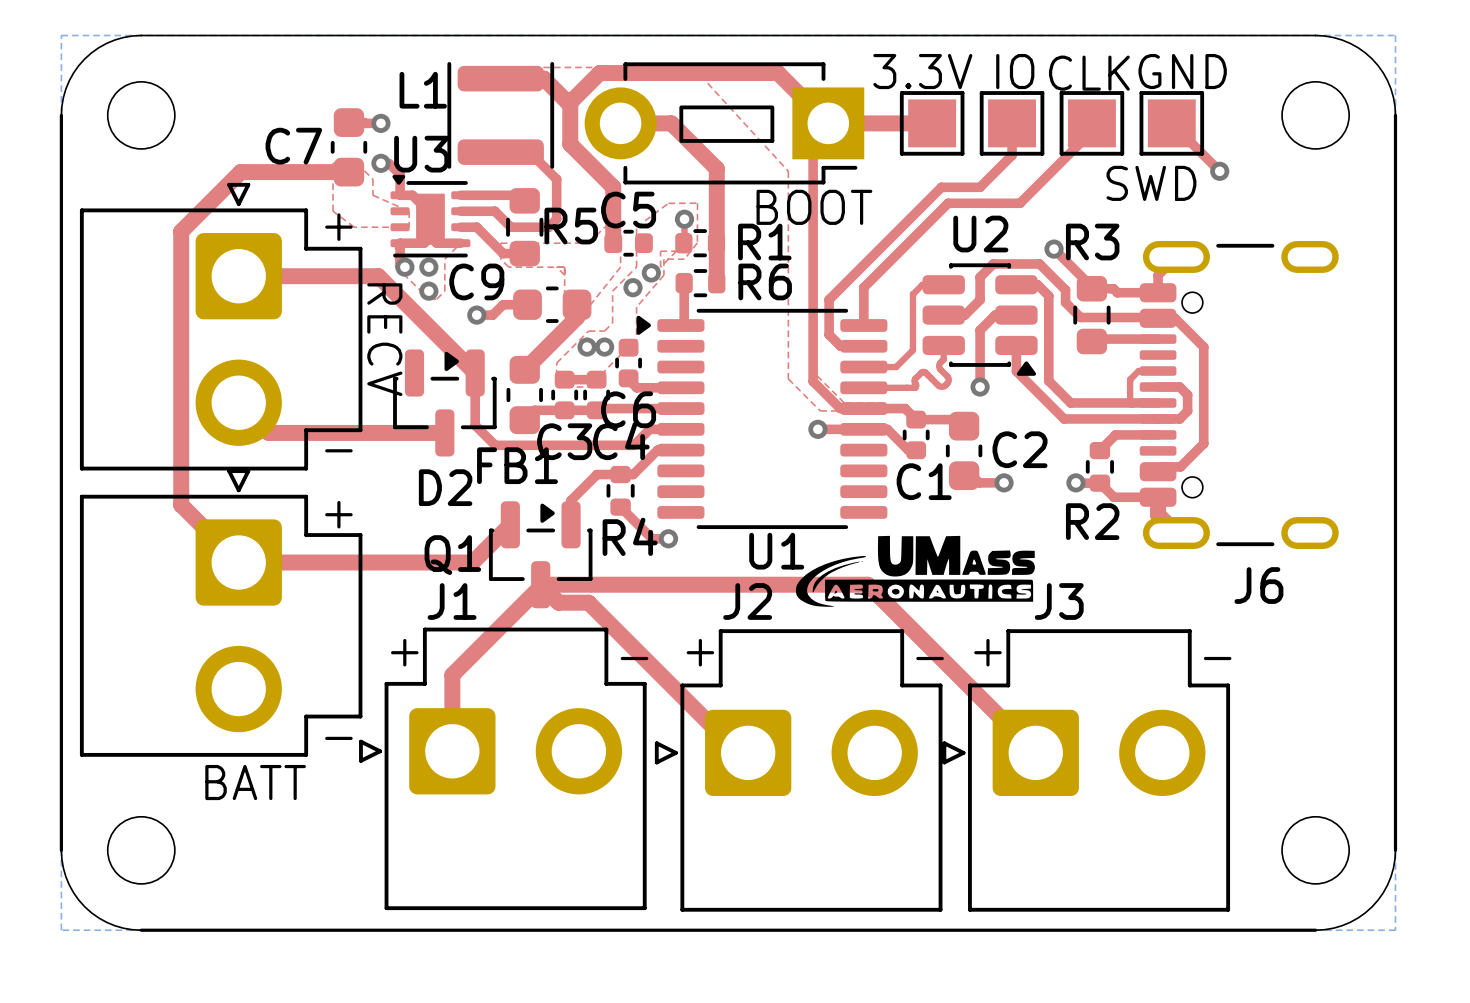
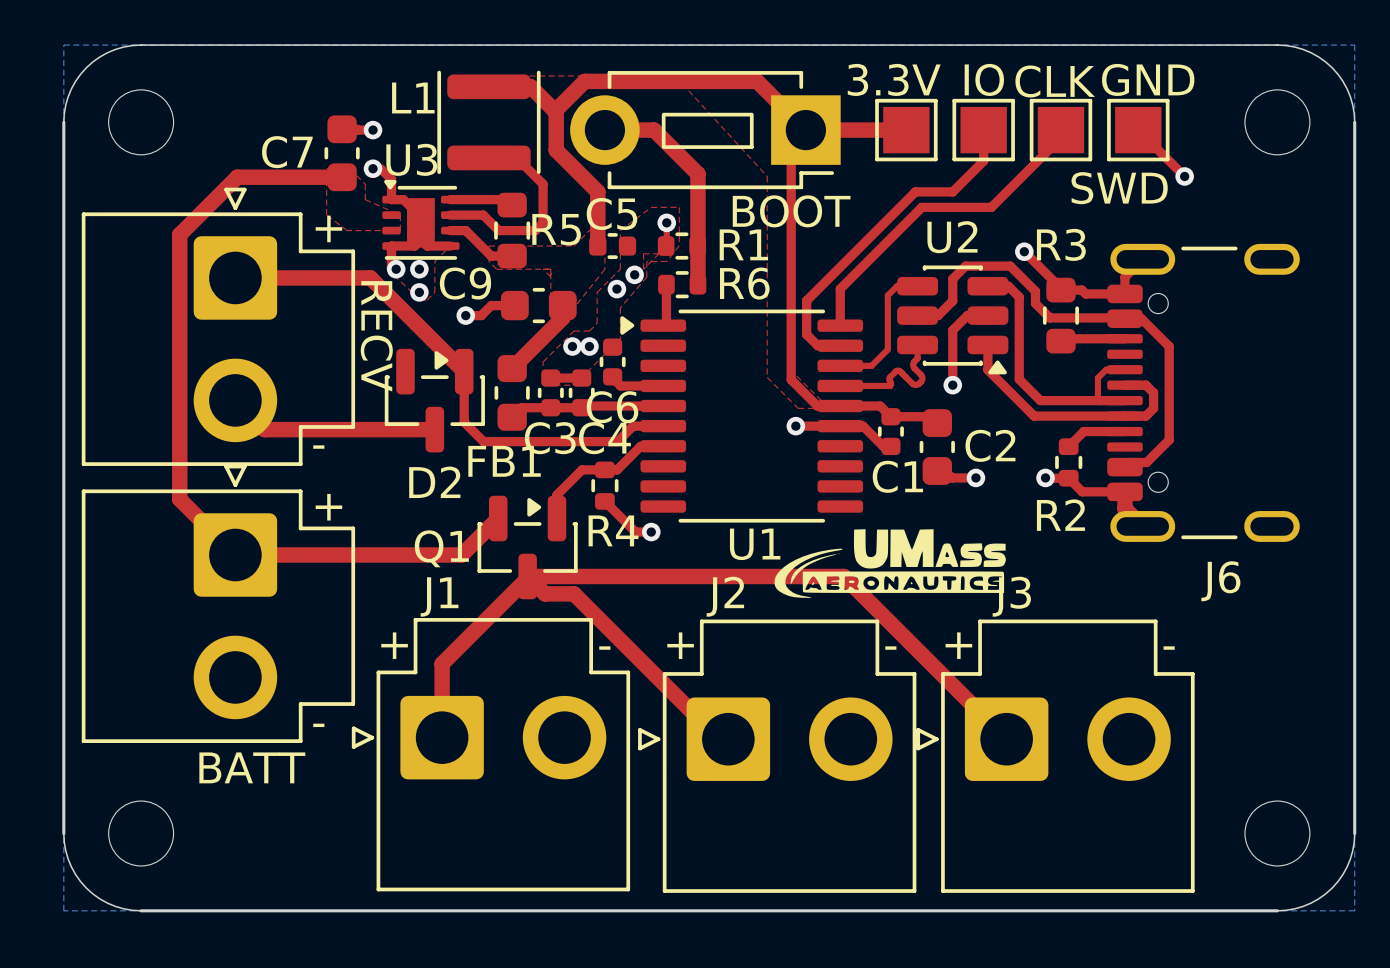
J3 name position: J3 (1059, 601) -> J3 (1011, 596)

